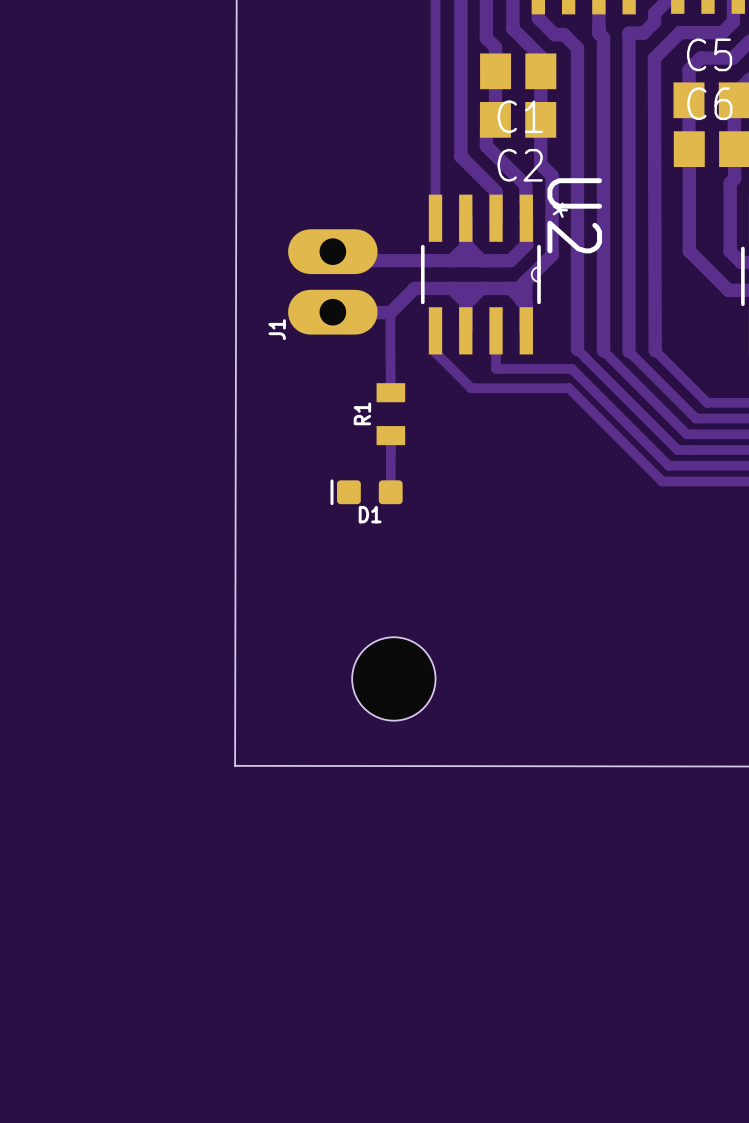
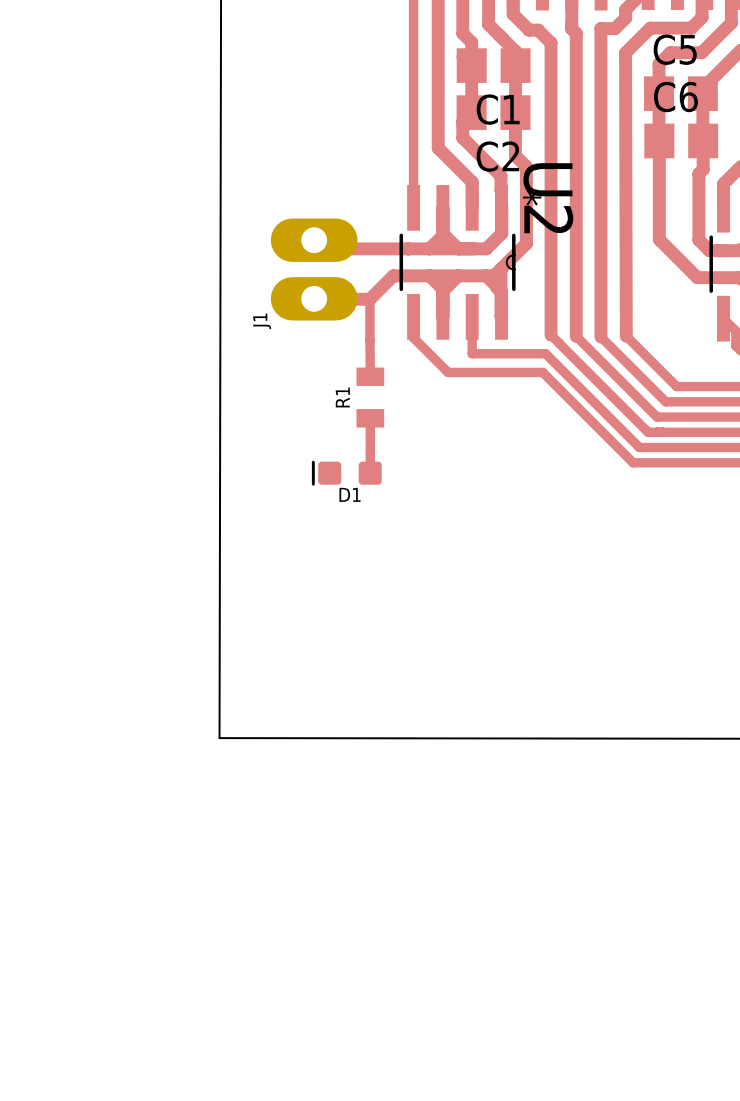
hole: (393, 678) -> none

